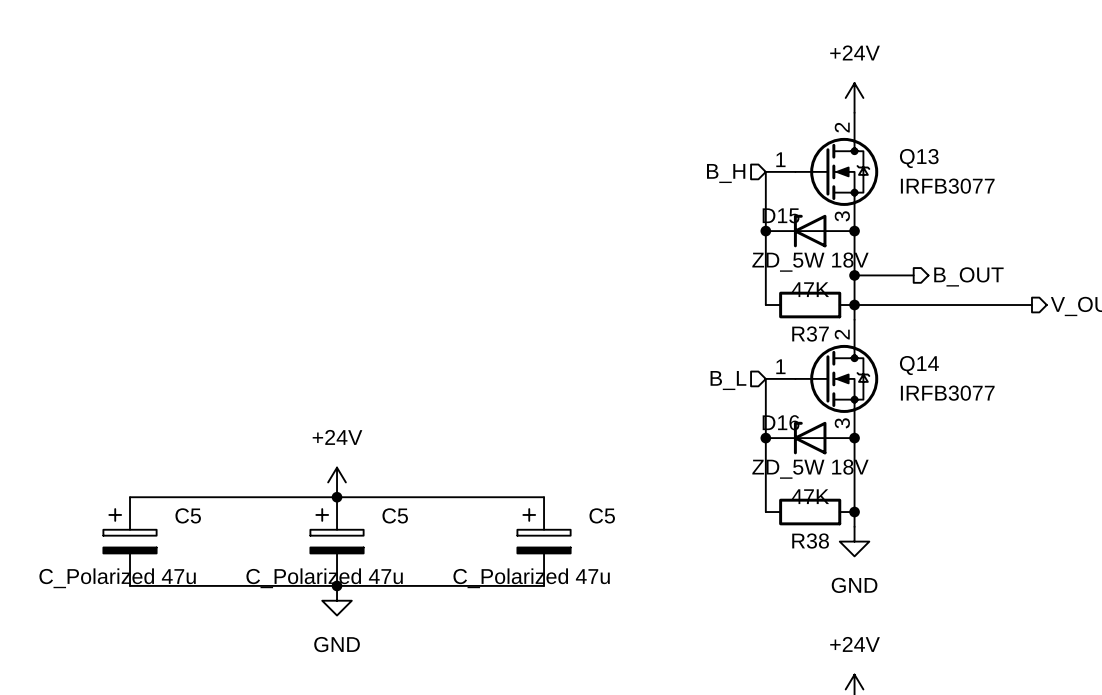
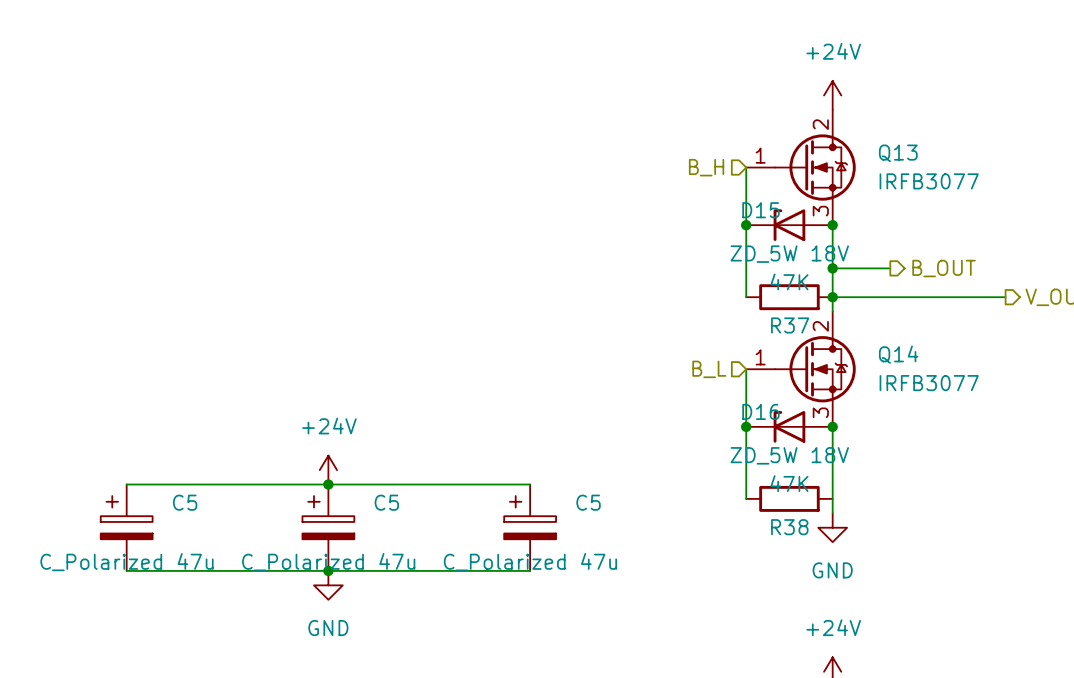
junction: (854, 512) -> none

